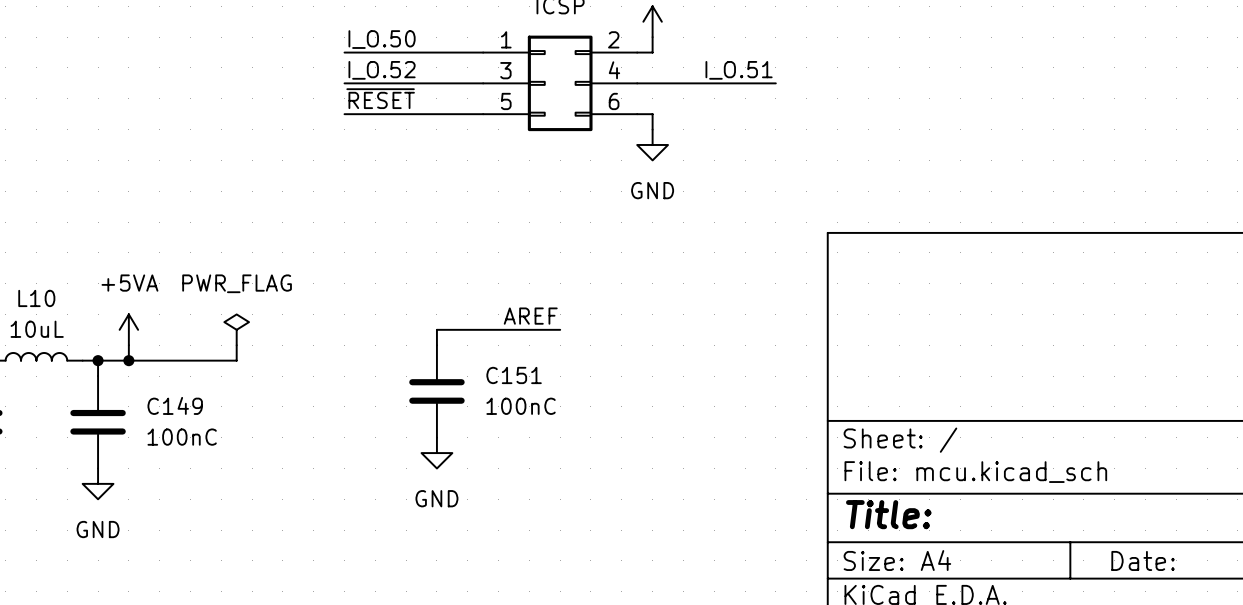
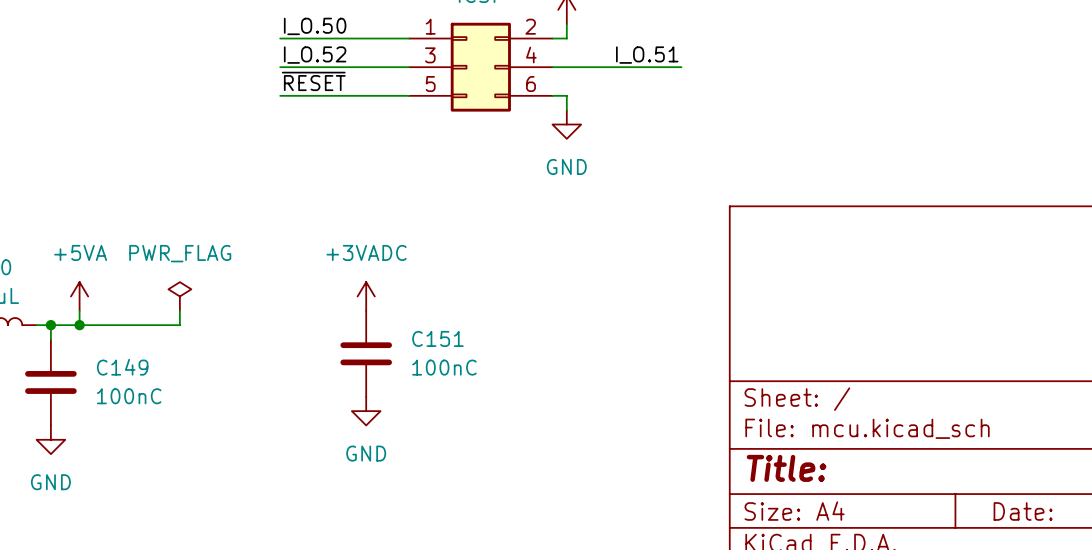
label: AREF (530, 316) -> none
power symbol: none -> +3VADC (366, 296)
wire: (560, 329) (436, 329) (436, 345) -> none

